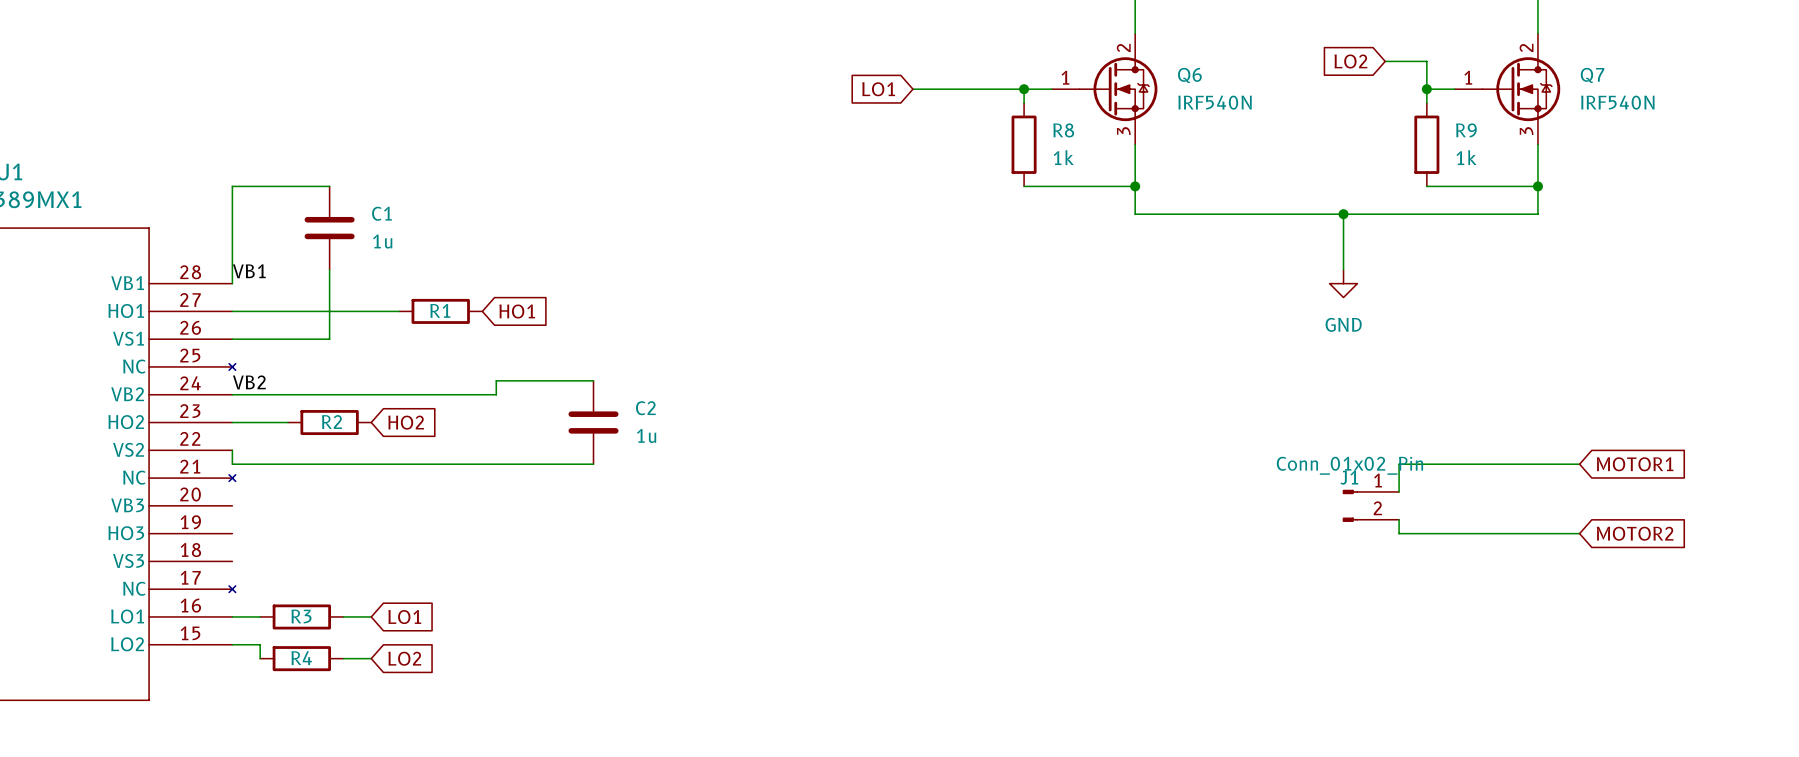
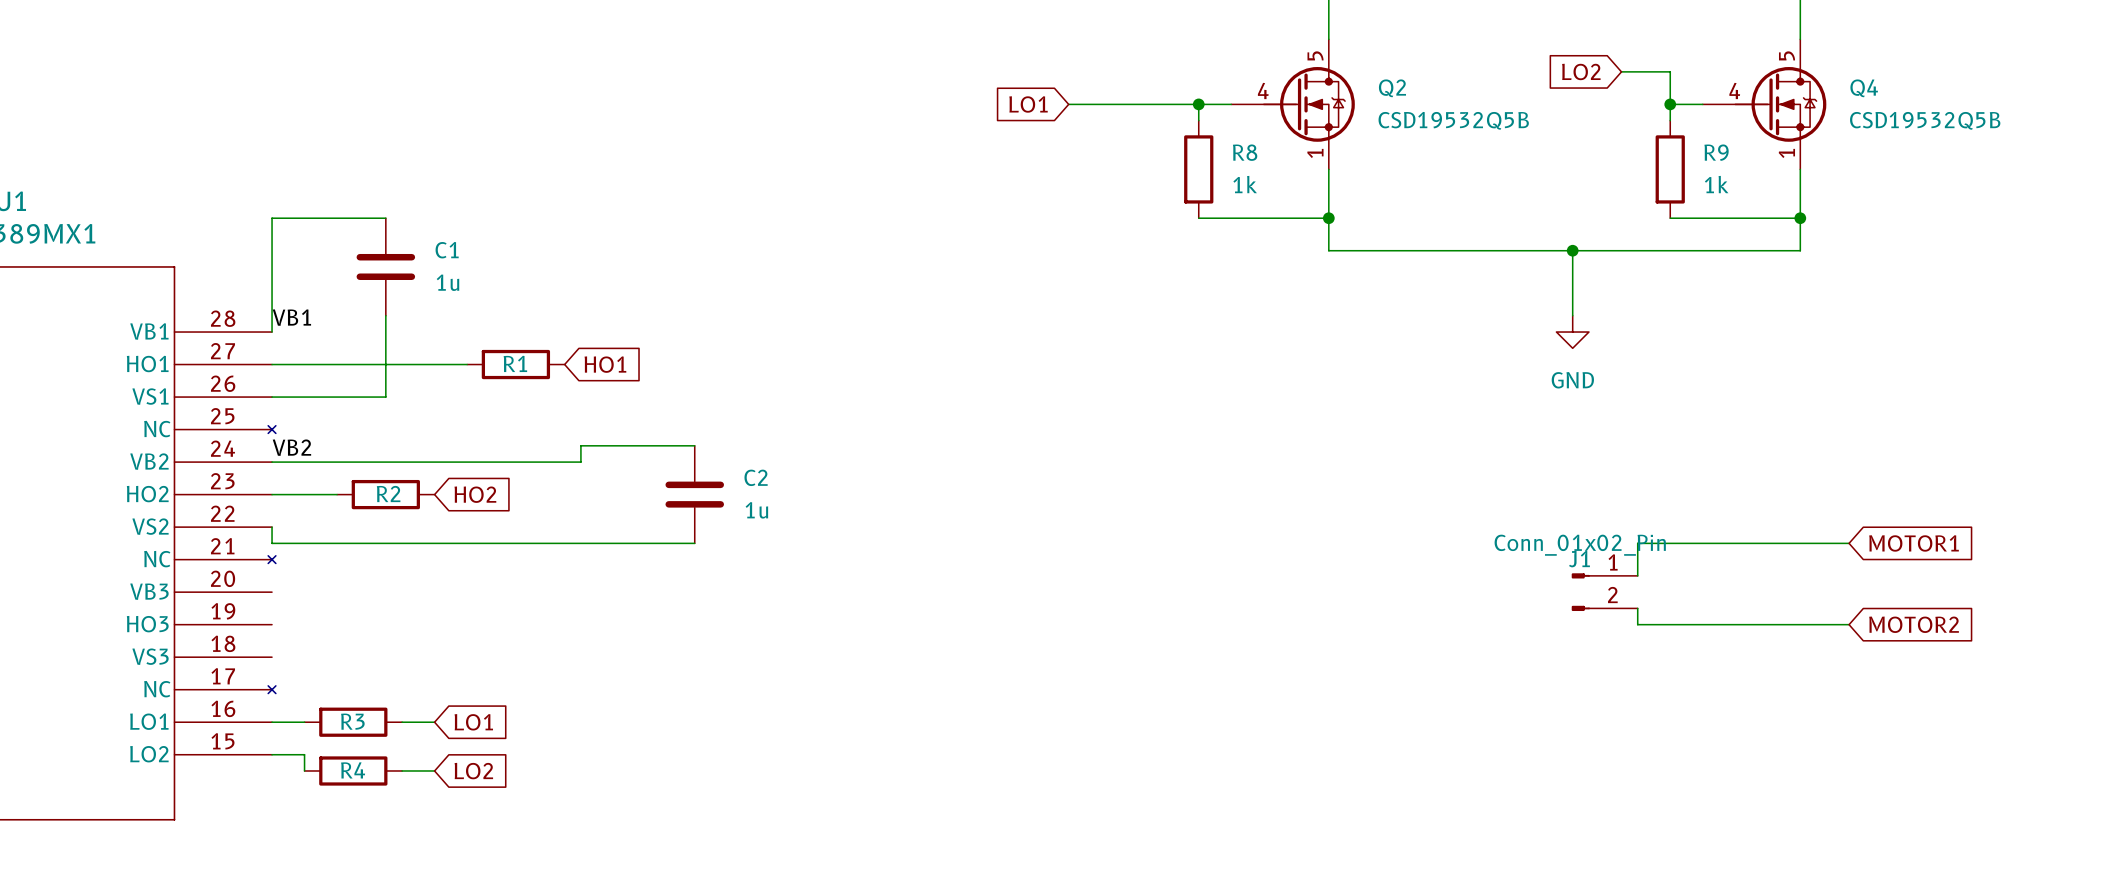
Q6: IRF540N (1104, 89) -> none
Q2: none -> CSD19532Q5B (1293, 104)
Q7: IRF540N (1507, 89) -> none
Q4: none -> CSD19532Q5B (1764, 104)

